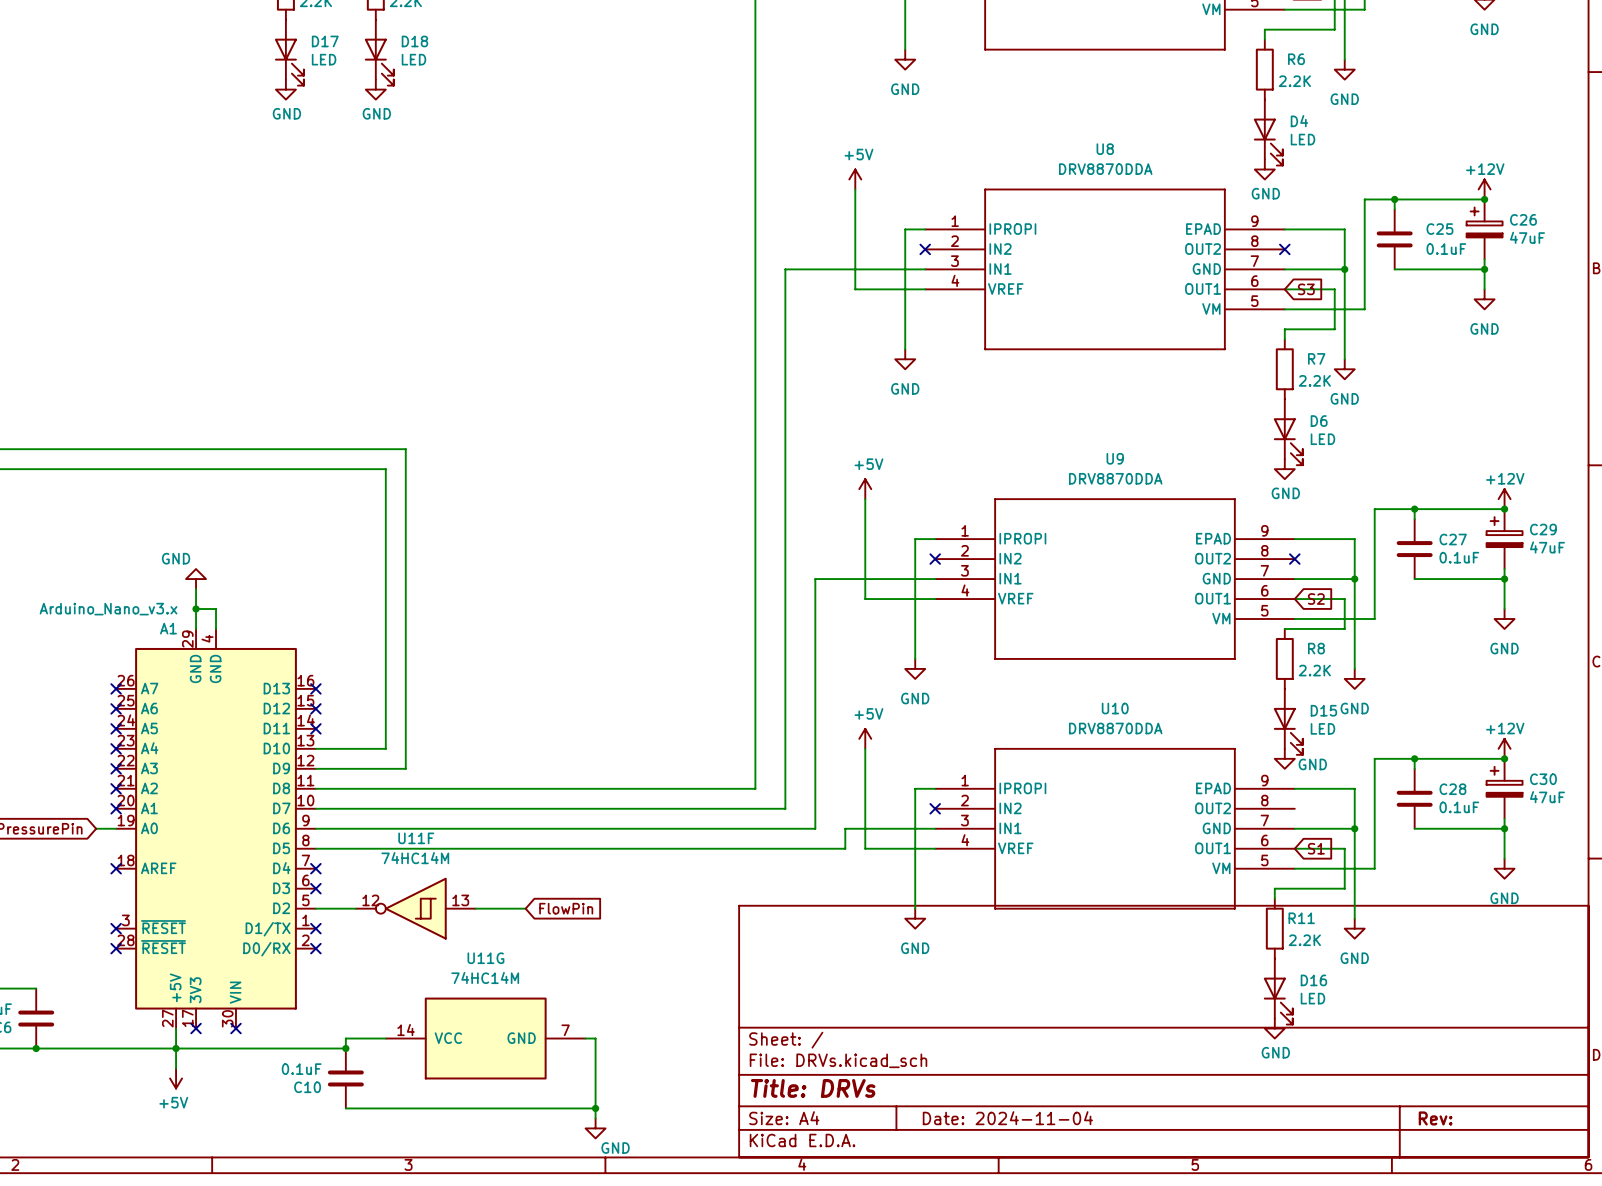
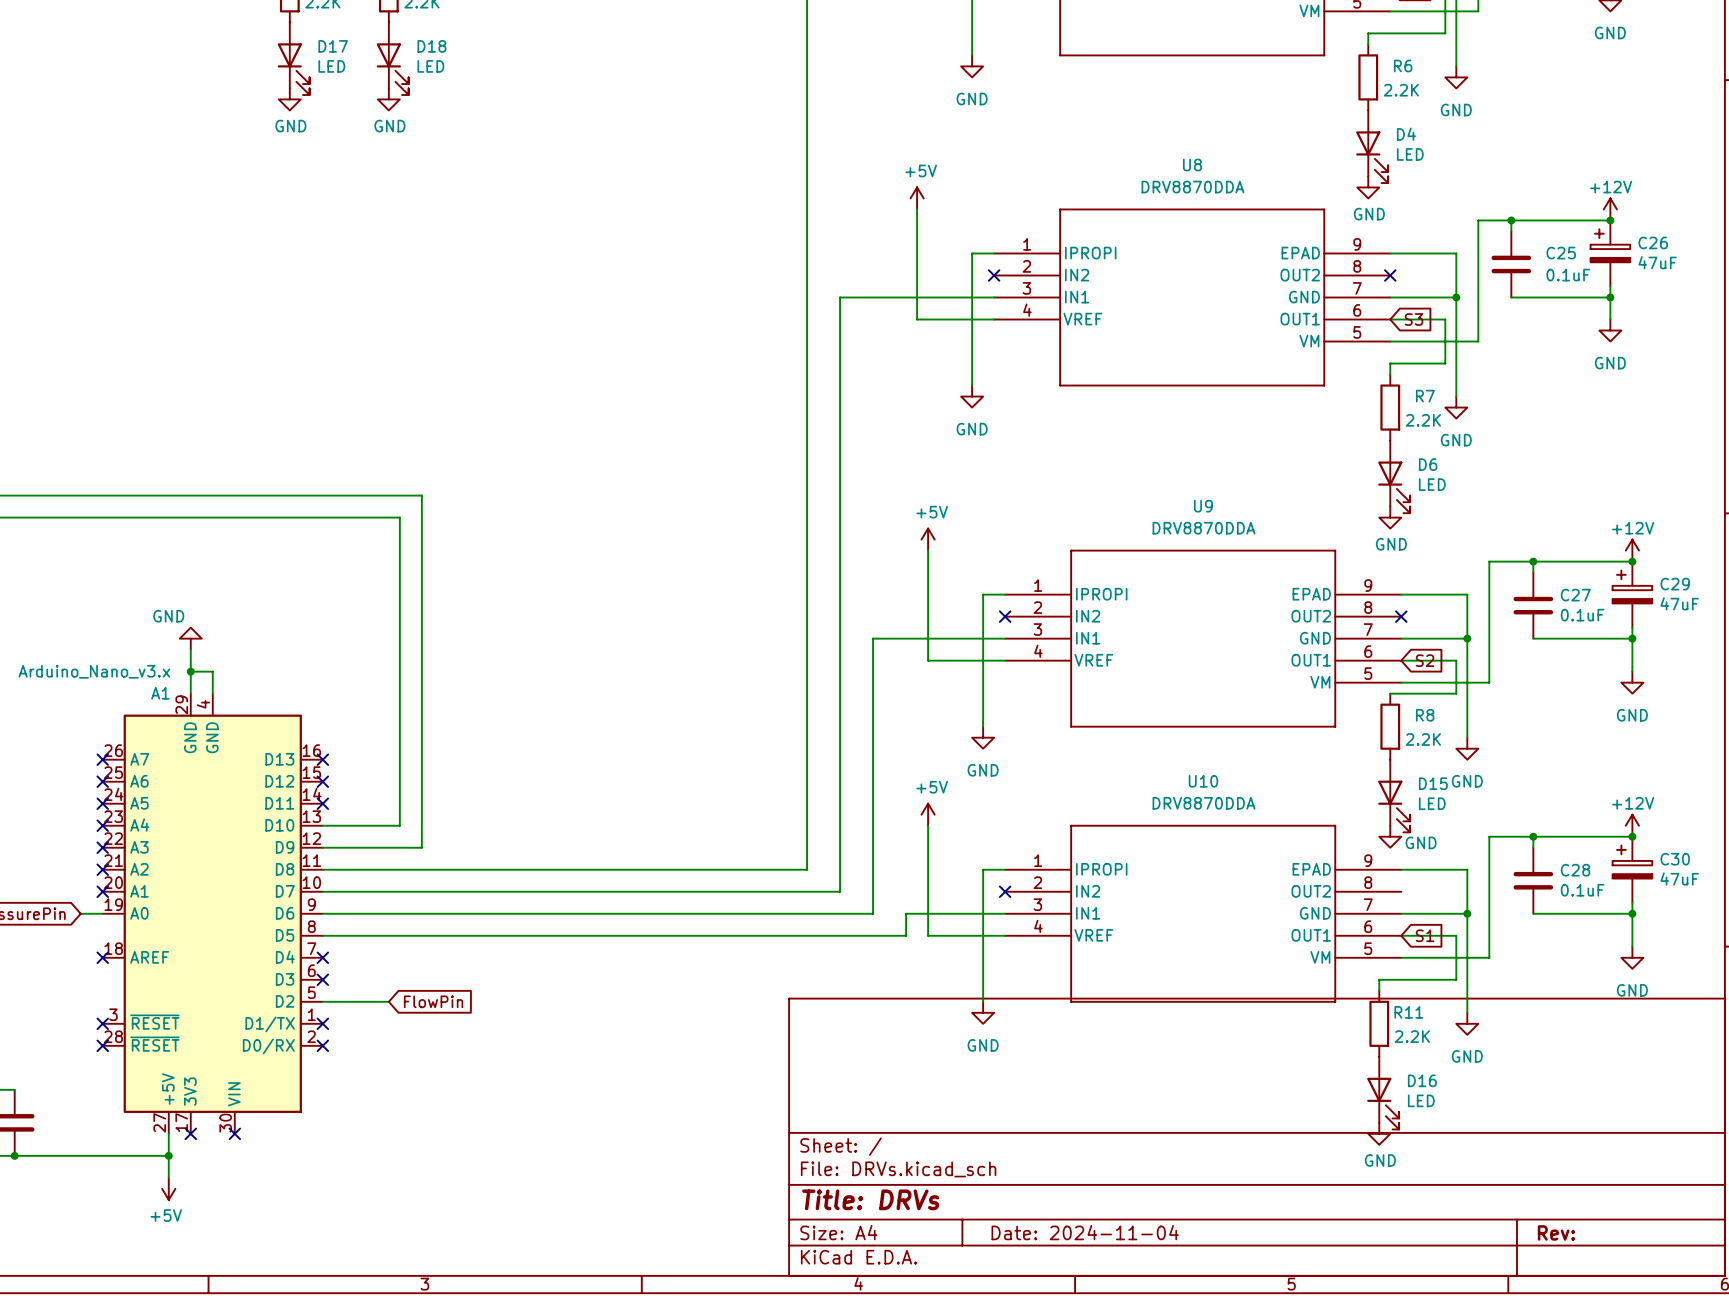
U11F: 74HC14M (415, 908) -> none
wire: (475, 908) (525, 908) -> none
global label position: FlowPin (566, 908) -> FlowPin (433, 1001)
wire: (385, 1038) (345, 1038) (345, 1048) (176, 1048) -> none
U11G: 74HC14M (485, 1038) -> none
wire: (585, 1038) (595, 1038) (595, 1118) -> none
junction: (345, 1048) -> none
C10: 0.1uF (345, 1078) -> none
wire: (345, 1108) (595, 1108) -> none
junction: (595, 1108) -> none
power symbol: GND (595, 1128) -> none

